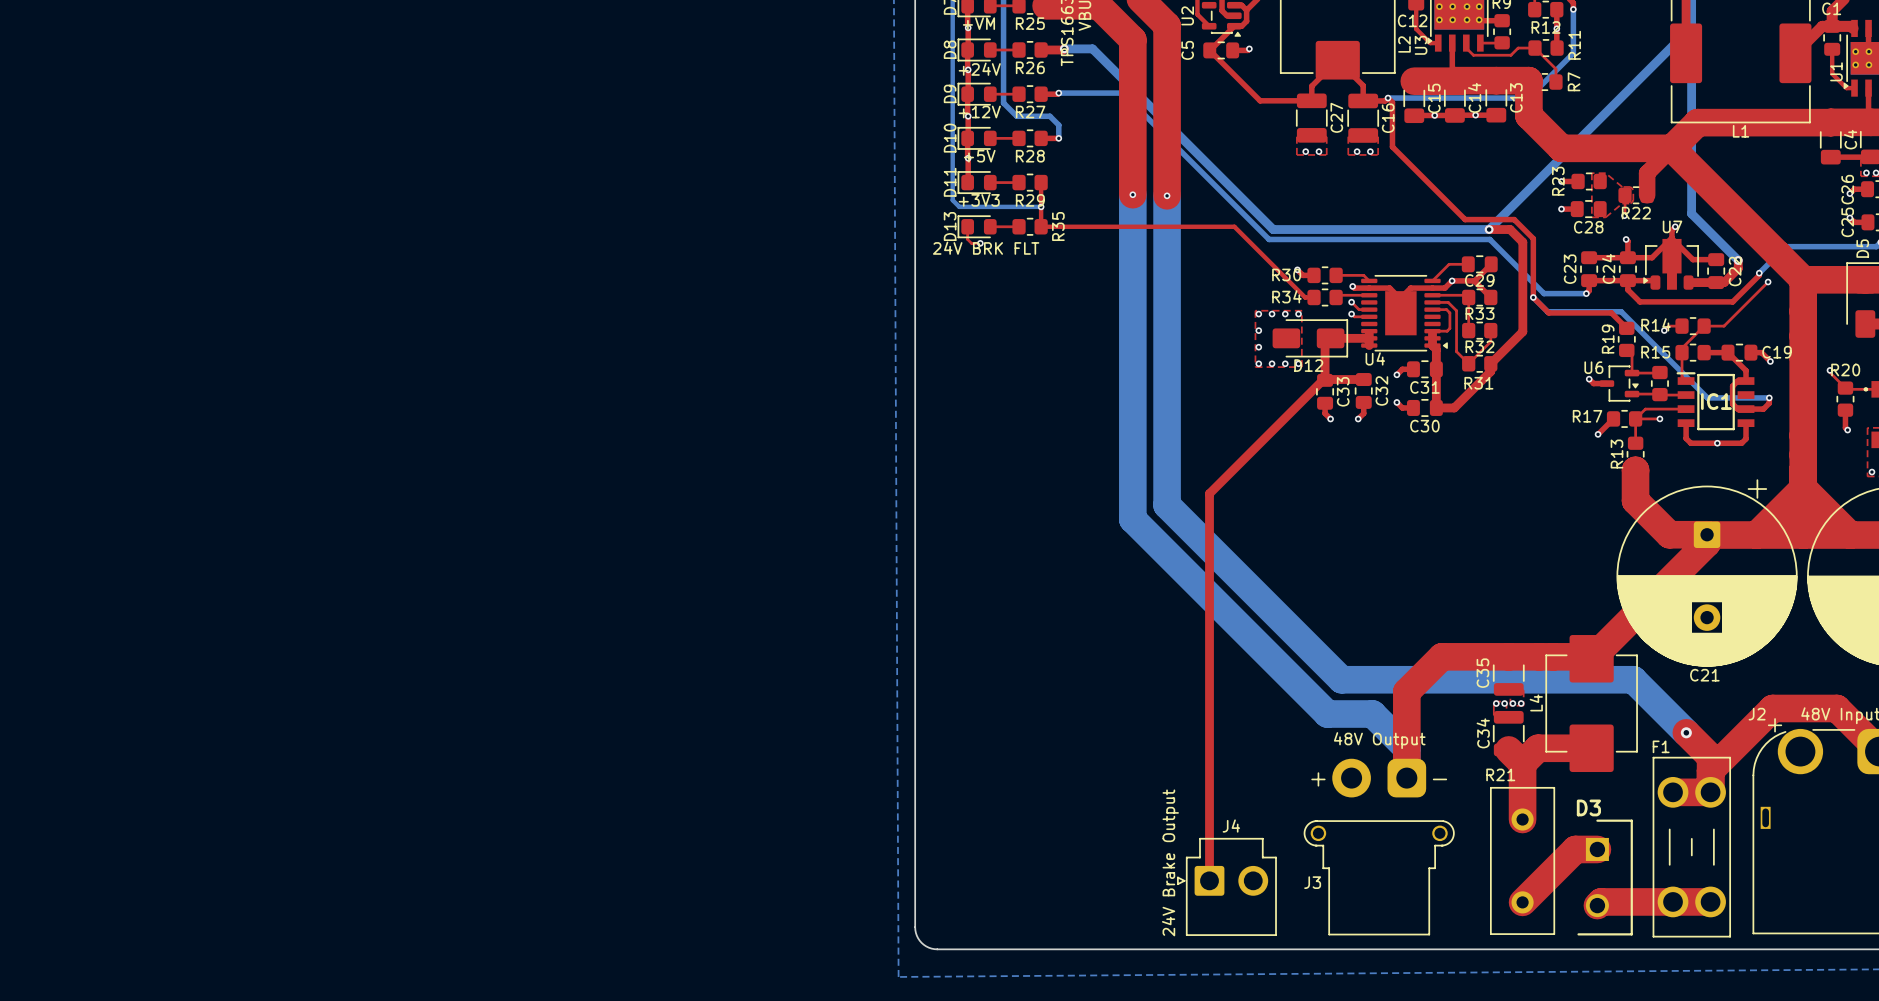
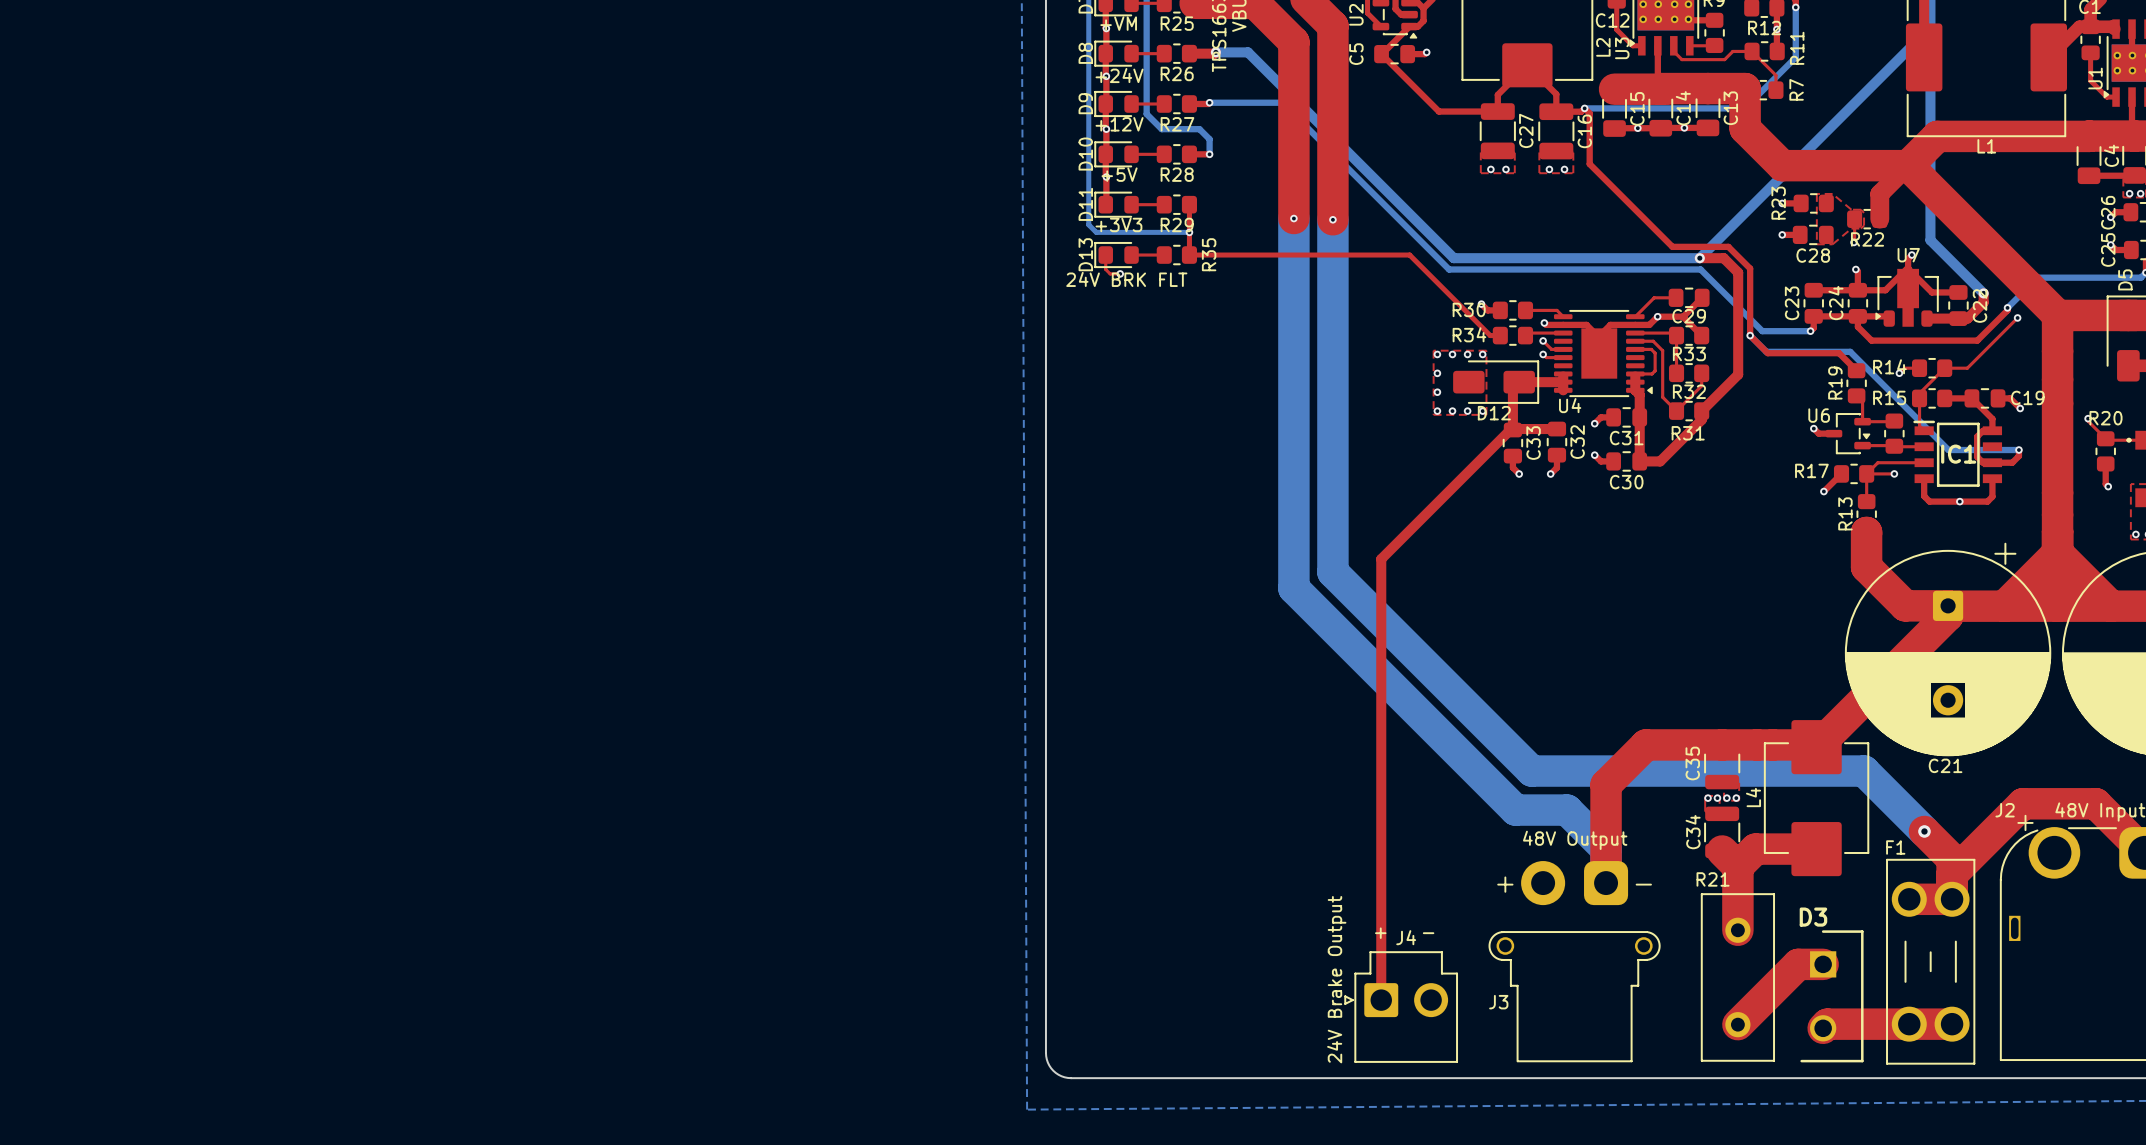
text: none -> + (1380, 933)
text: none -> - (1428, 933)

